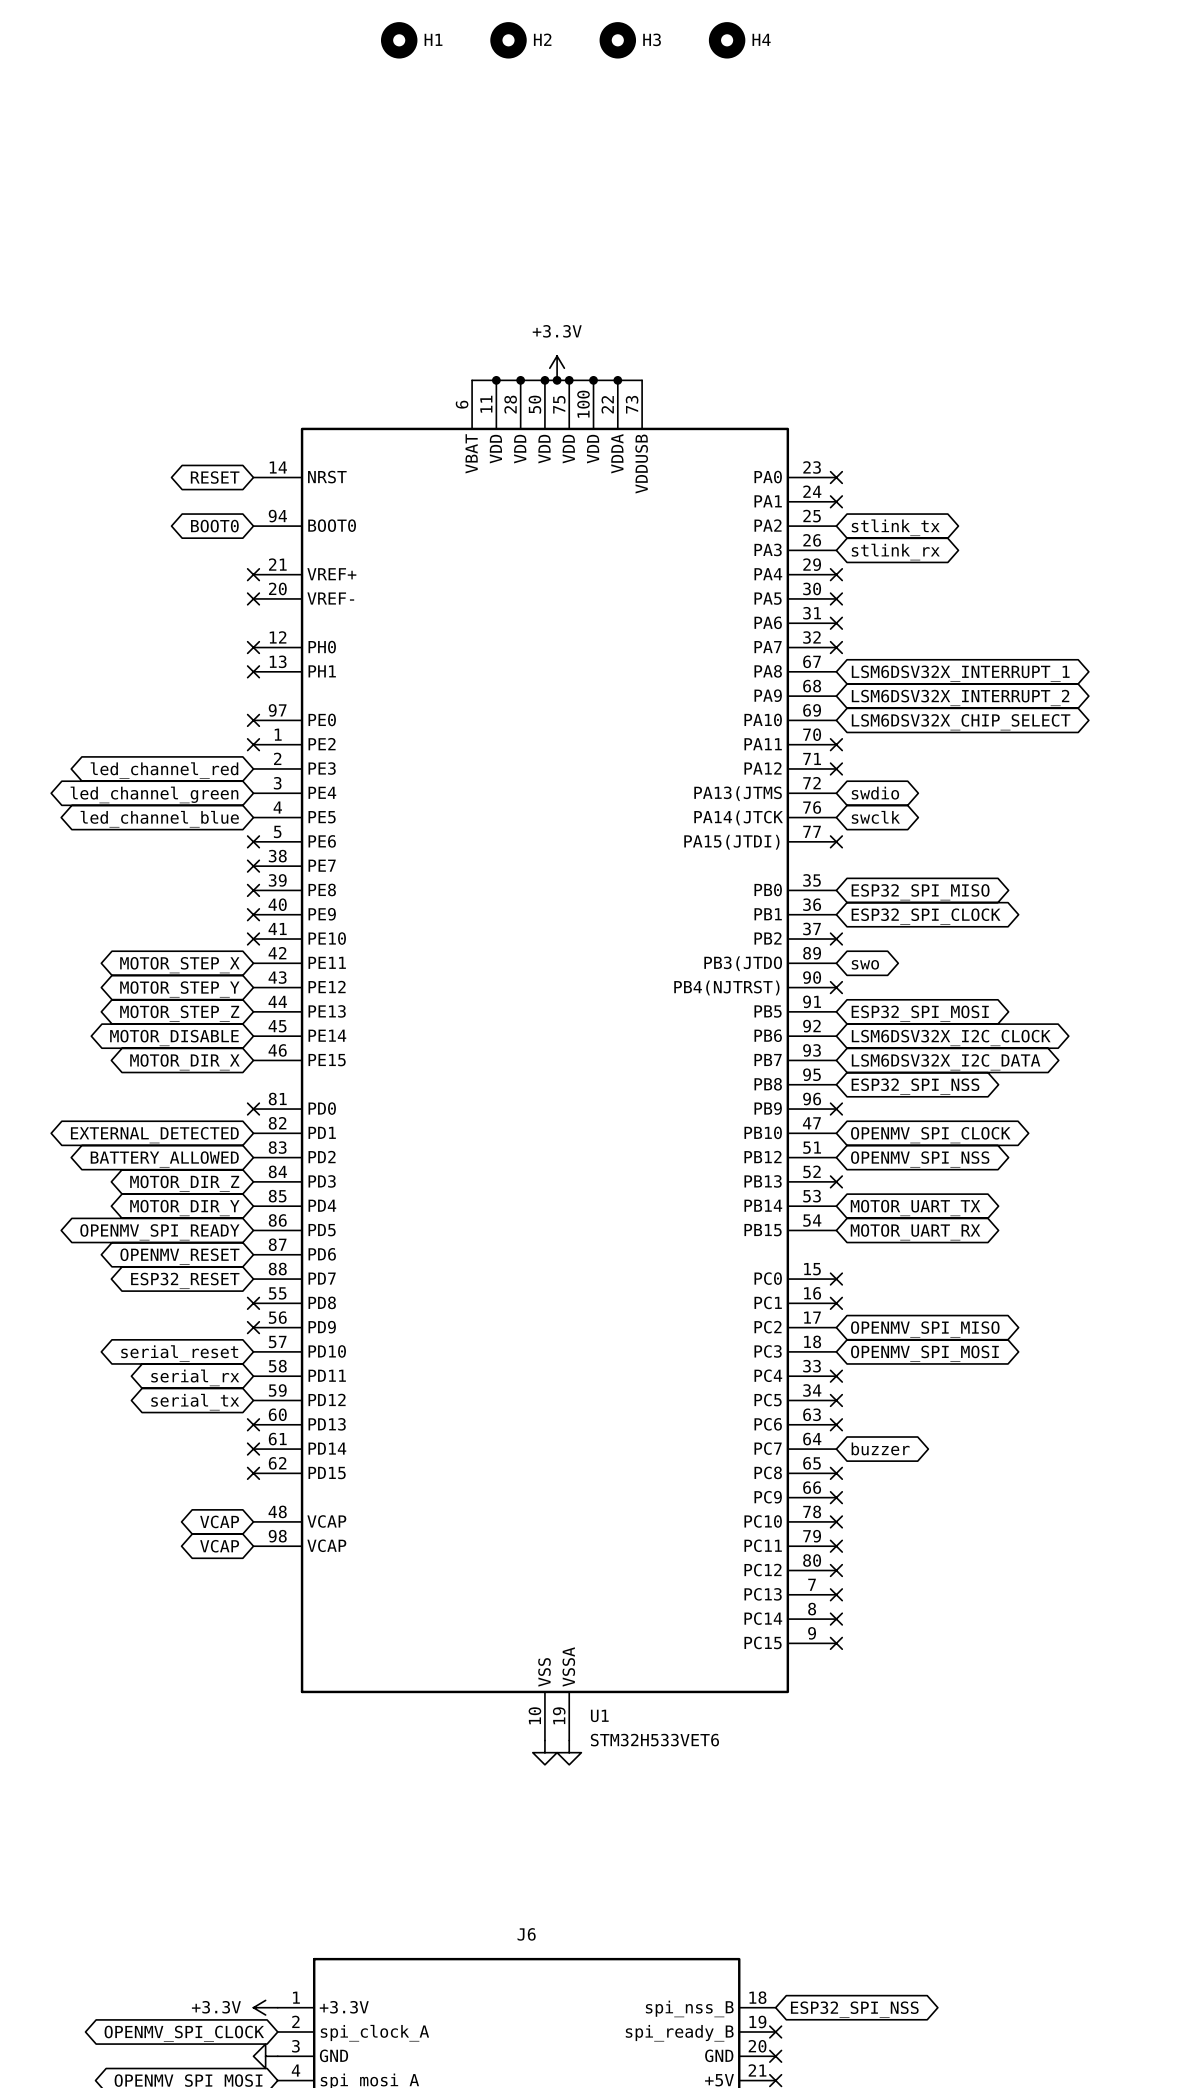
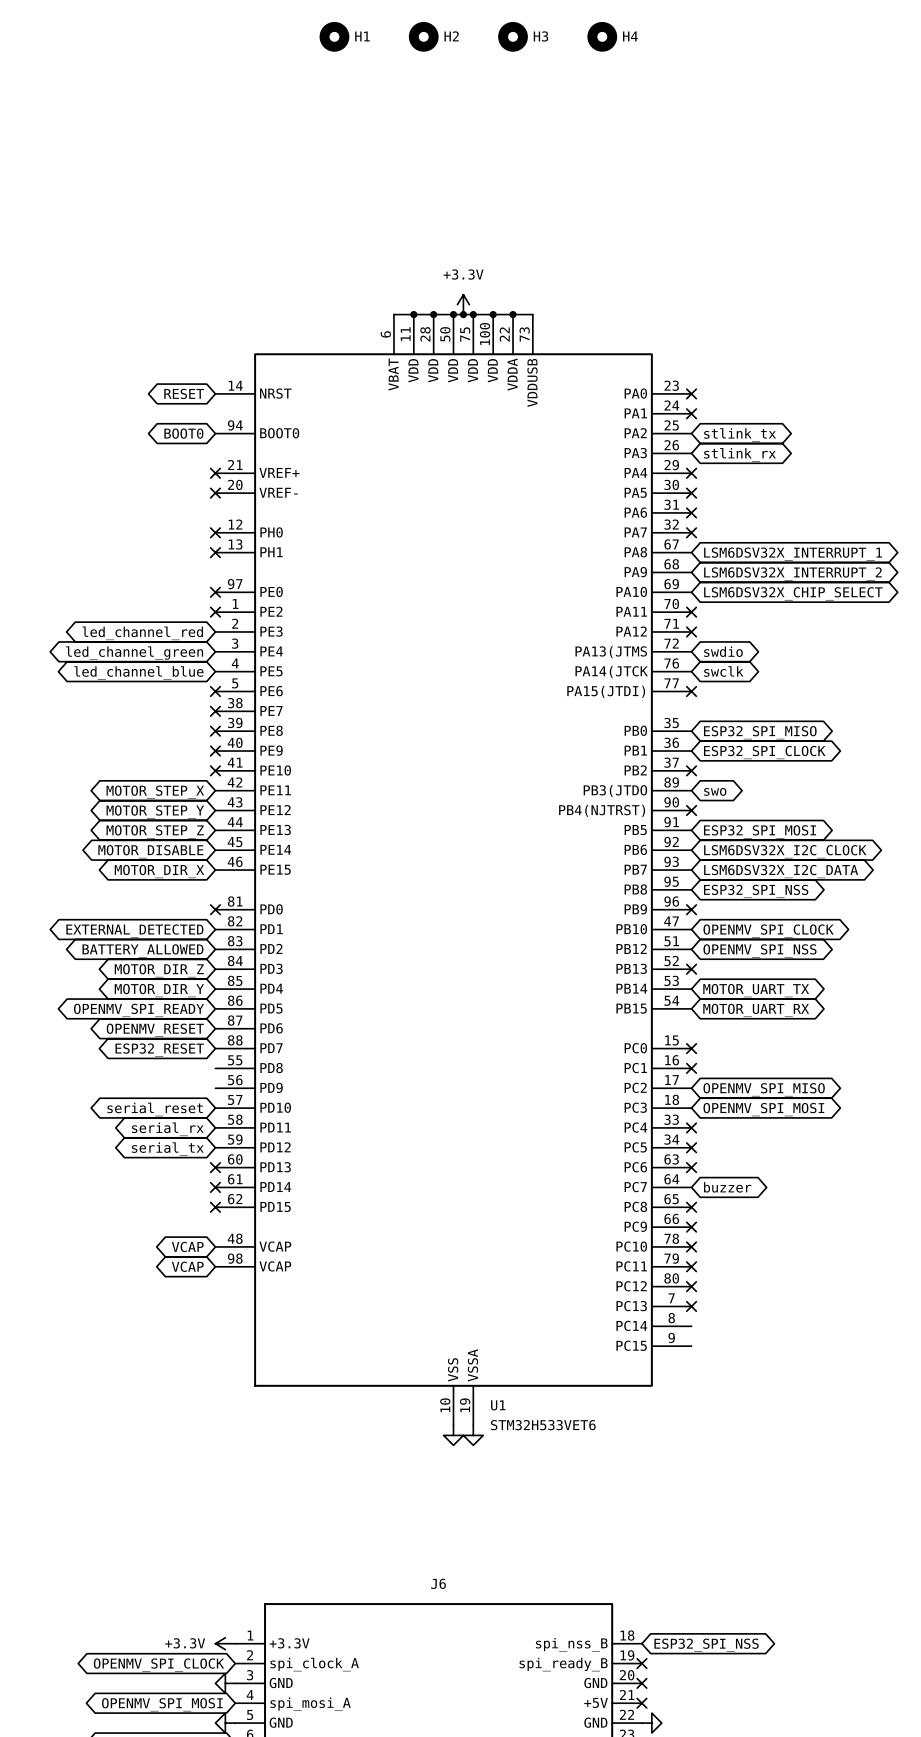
no-connect mark: (253, 1303) -> none
no-connect mark: (253, 1327) -> none
no-connect mark: (836, 1619) -> none
no-connect mark: (836, 1643) -> none

